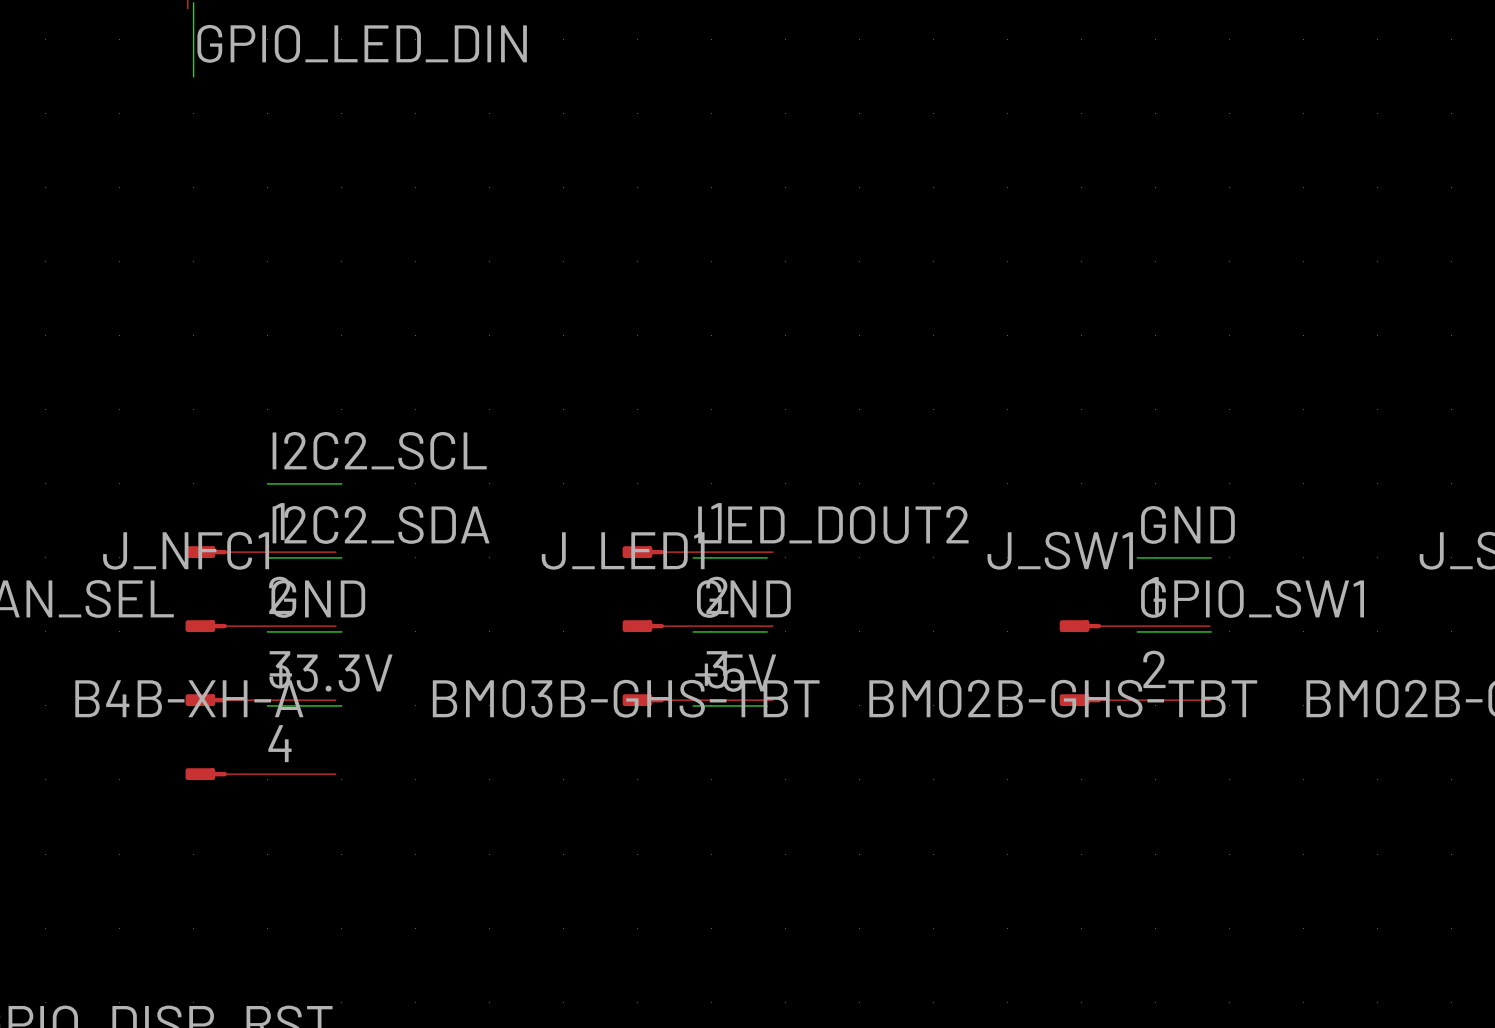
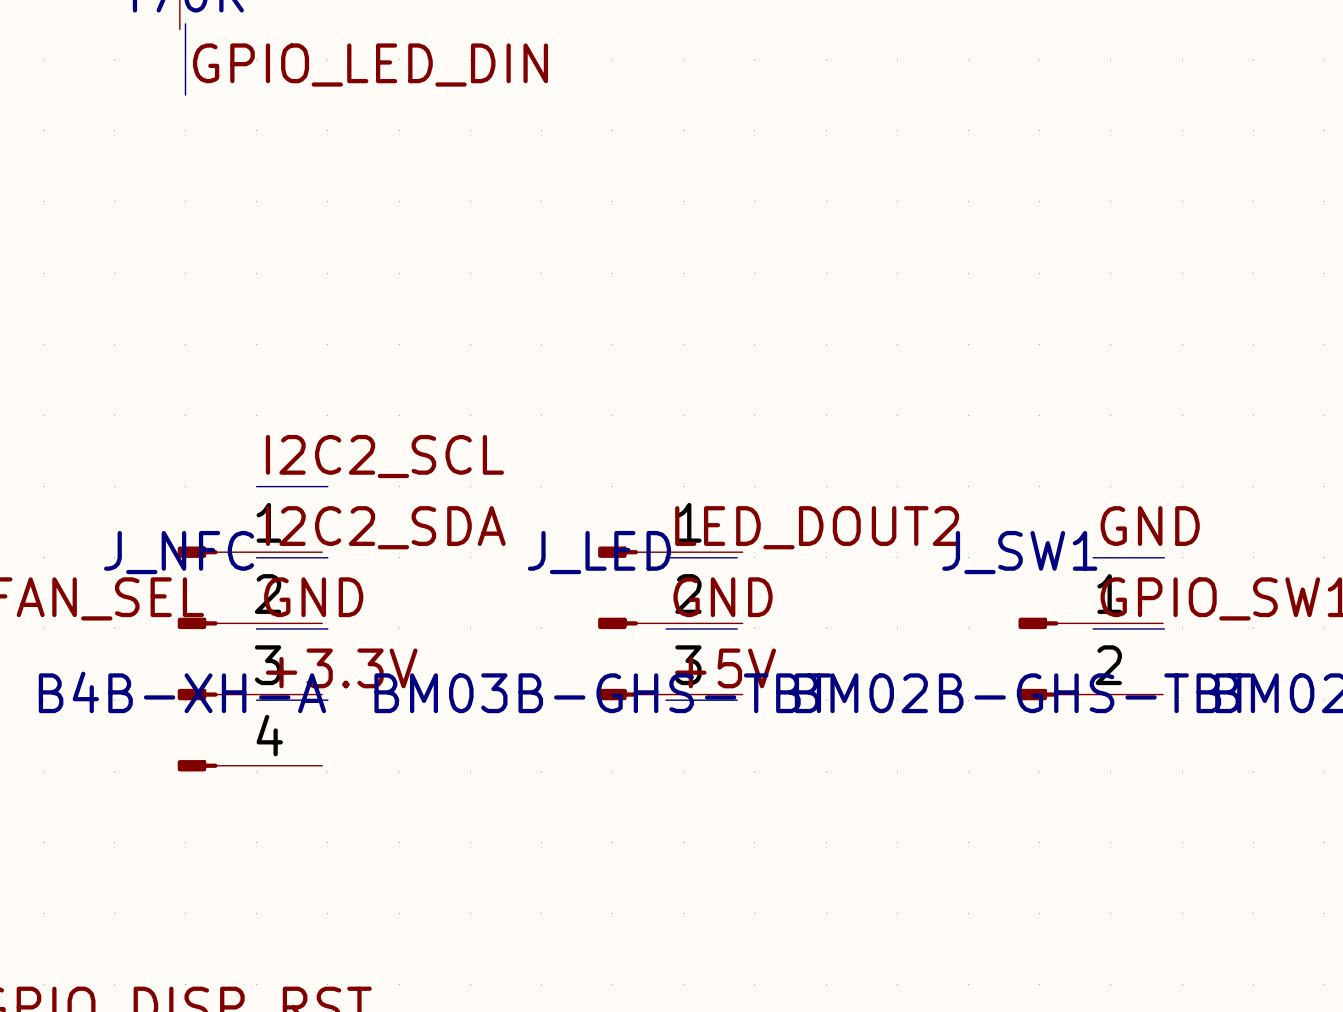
J_NFC1 name: J_NFC1 (186, 550) -> J_NFC (179, 552)
J_LED1 name: J_LED1 (623, 550) -> J_LED (599, 552)

